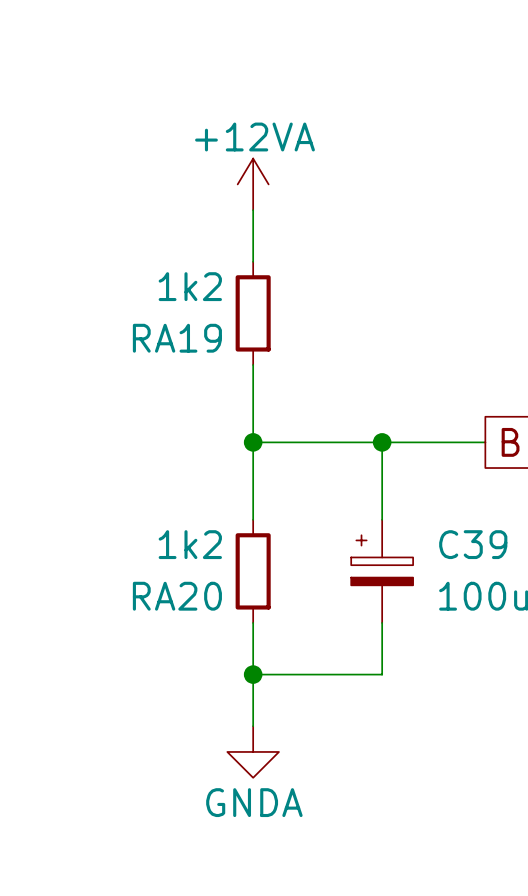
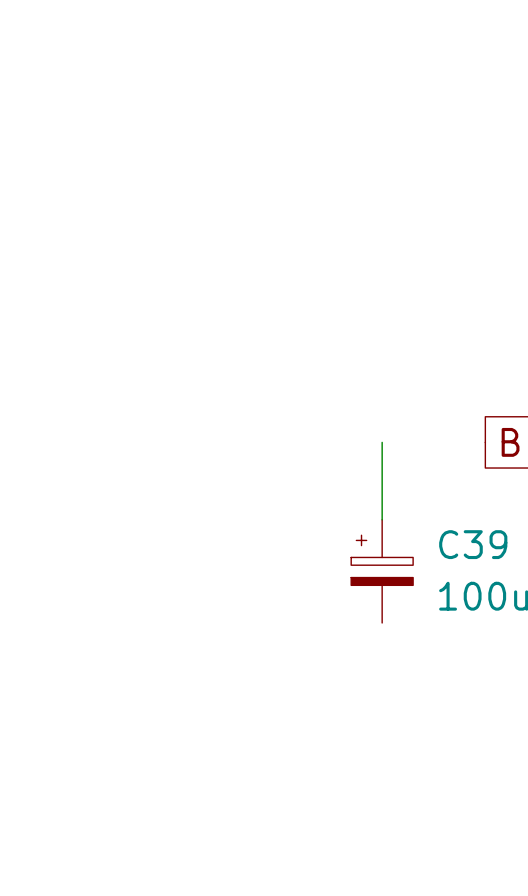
power symbol: +12VA (253, 184) -> none
wire: (253, 210) (253, 261) -> none
RA19: 1k2 (253, 313) -> none
wire: (253, 364) (253, 519) -> none
wire: (253, 442) (485, 442) -> none
junction: (253, 442) -> none
junction: (382, 442) -> none
RA20: 1k2 (253, 571) -> none
wire: (253, 622) (253, 726) -> none
wire: (382, 622) (382, 674) (253, 674) -> none
junction: (253, 674) -> none
power symbol: GNDA (253, 751) -> none

